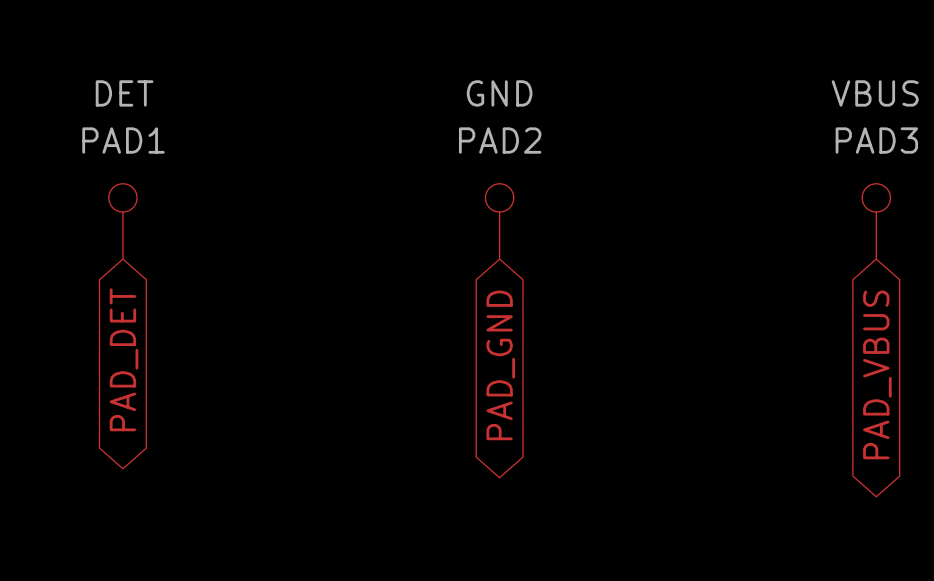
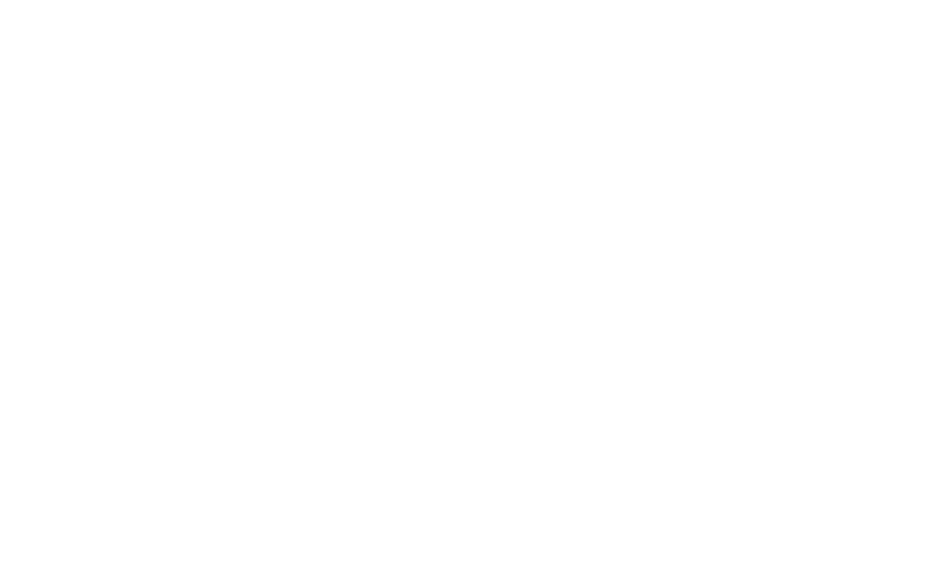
PAD1: DET (122, 221) -> none
PAD2: GND (499, 221) -> none
PAD3: VBUS (876, 221) -> none
global label: PAD_DET (124, 359) -> none
global label: PAD_GND (500, 365) -> none
global label: PAD_VBUS (877, 374) -> none

